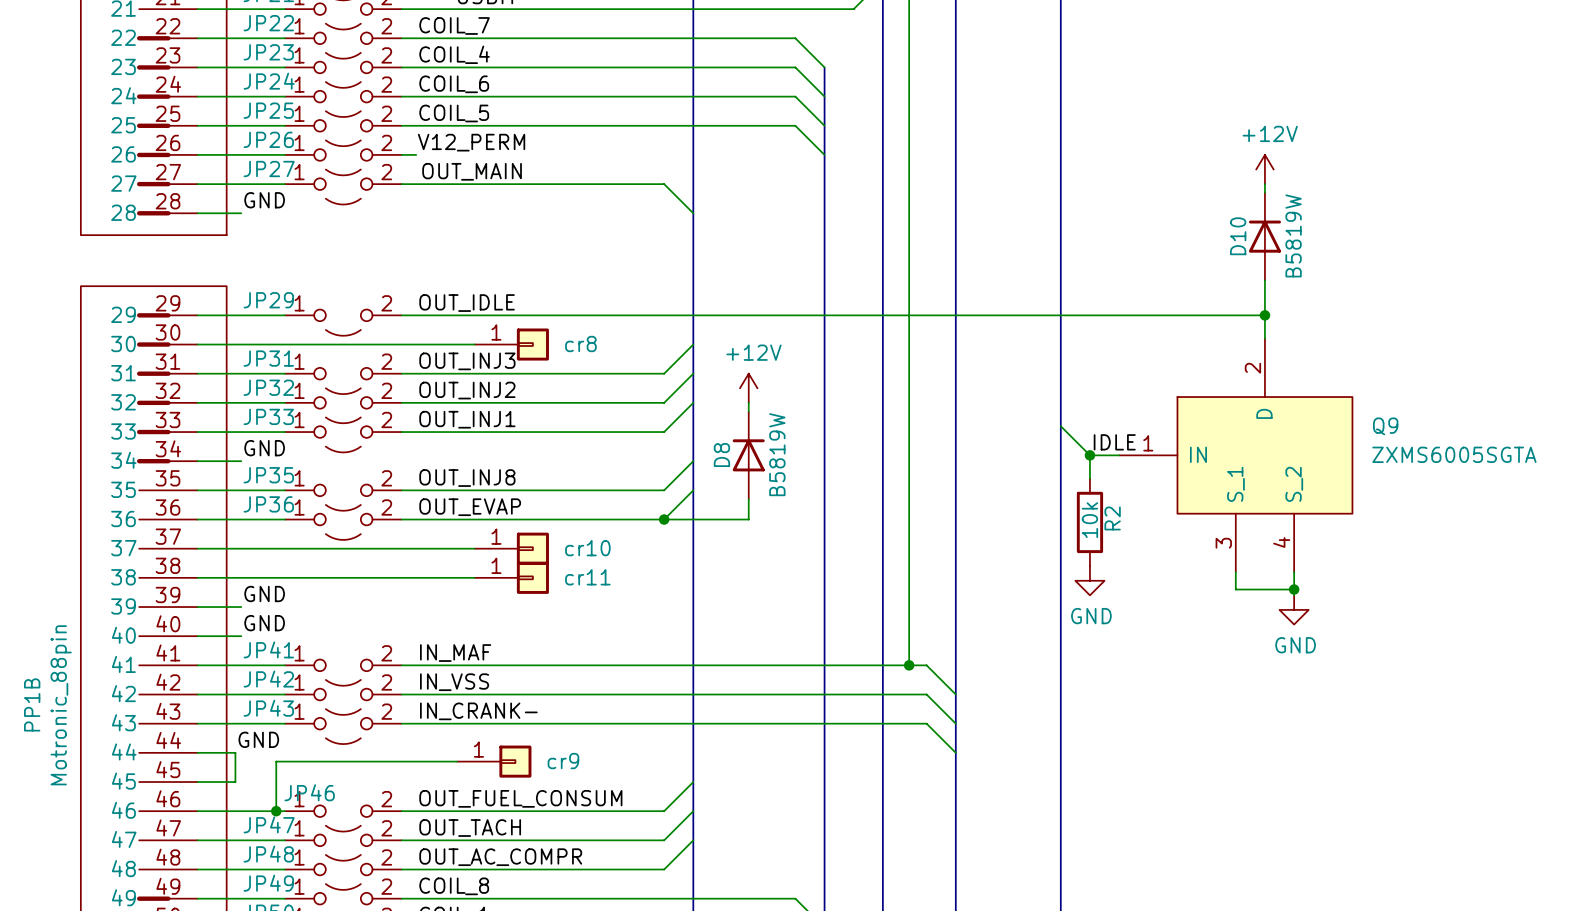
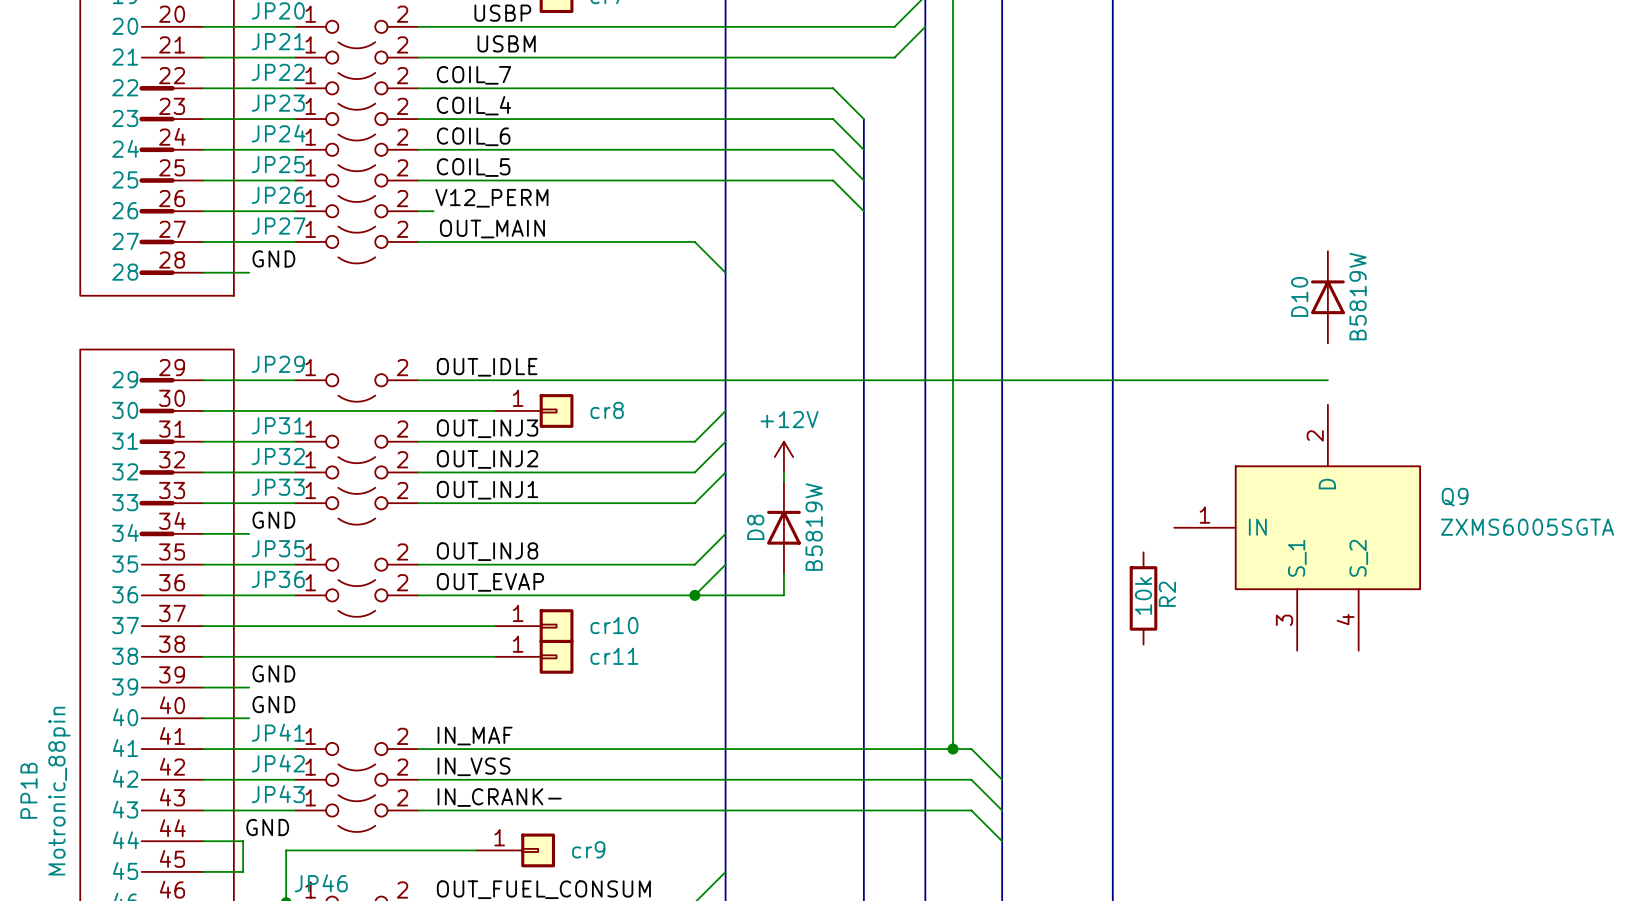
power symbol: +12V (1264, 169) -> none
wire: (1264, 184) (1264, 192) -> none
wire: (1264, 280) (1264, 338) -> none
junction: (1264, 315) -> none
wire: (1060, 426) (1089, 455) -> none
label: IDLE (1114, 442) -> none
wire: (1089, 455) (1089, 478) -> none
wire: (1089, 455) (1119, 455) -> none
junction: (1089, 455) -> none
wire: (1235, 572) (1235, 589) (1294, 589) -> none
wire: (1294, 572) (1294, 595) -> none
power symbol: GND (1089, 580) -> none
junction: (1294, 589) -> none
power symbol: GND (1294, 609) -> none

